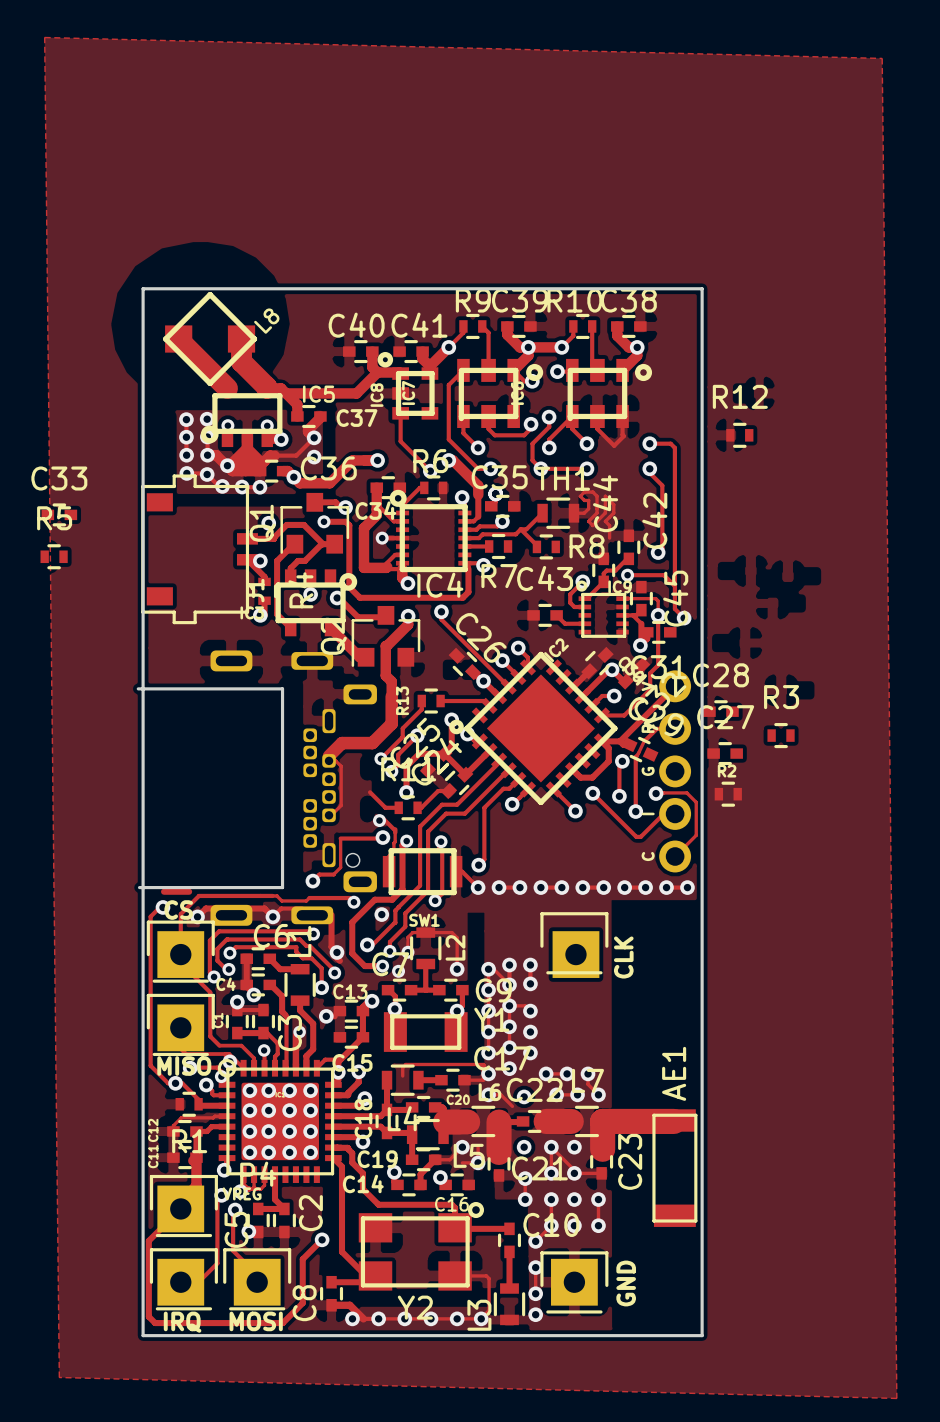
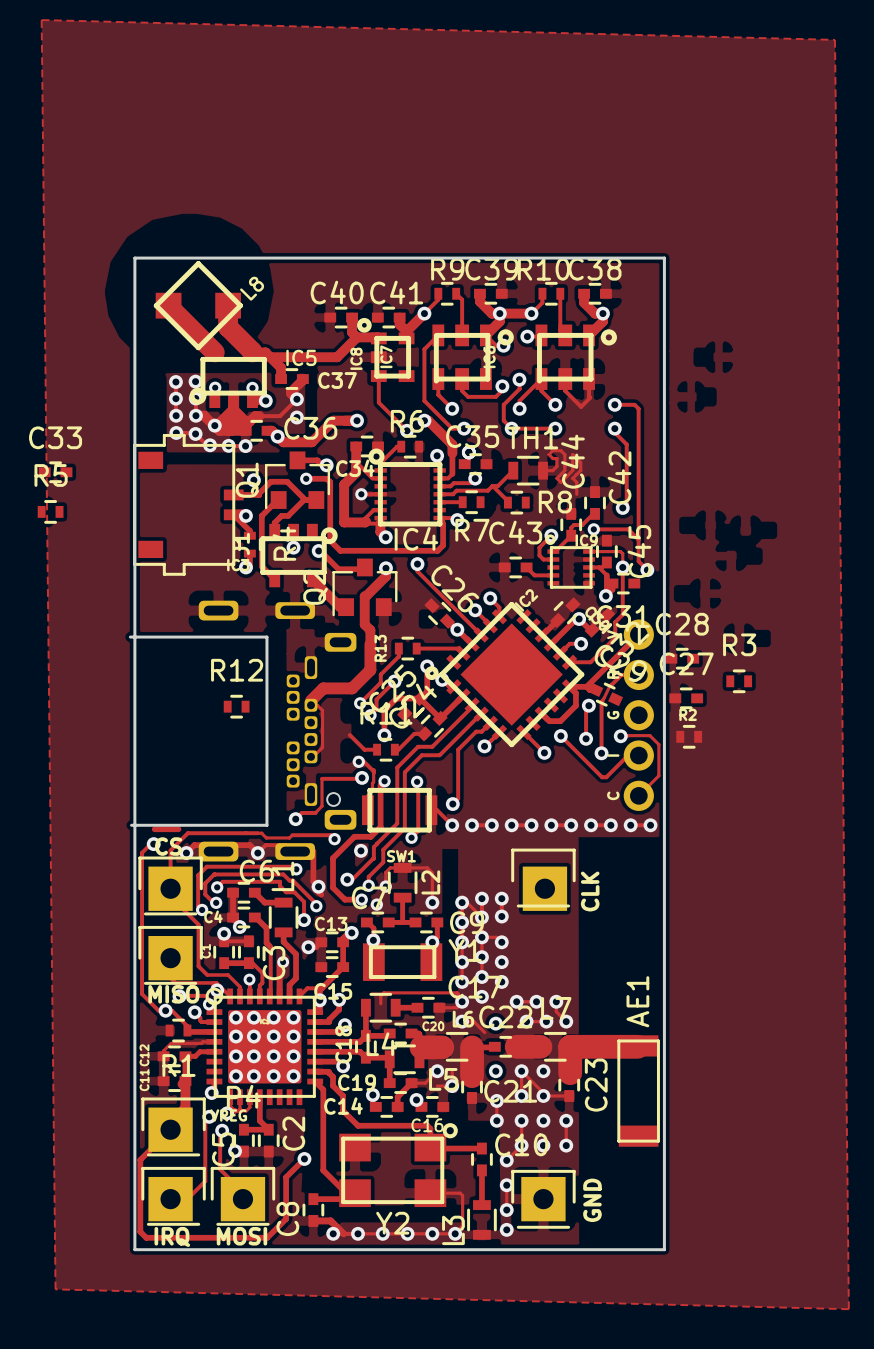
R12 position: (739, 435) -> (236, 706)

